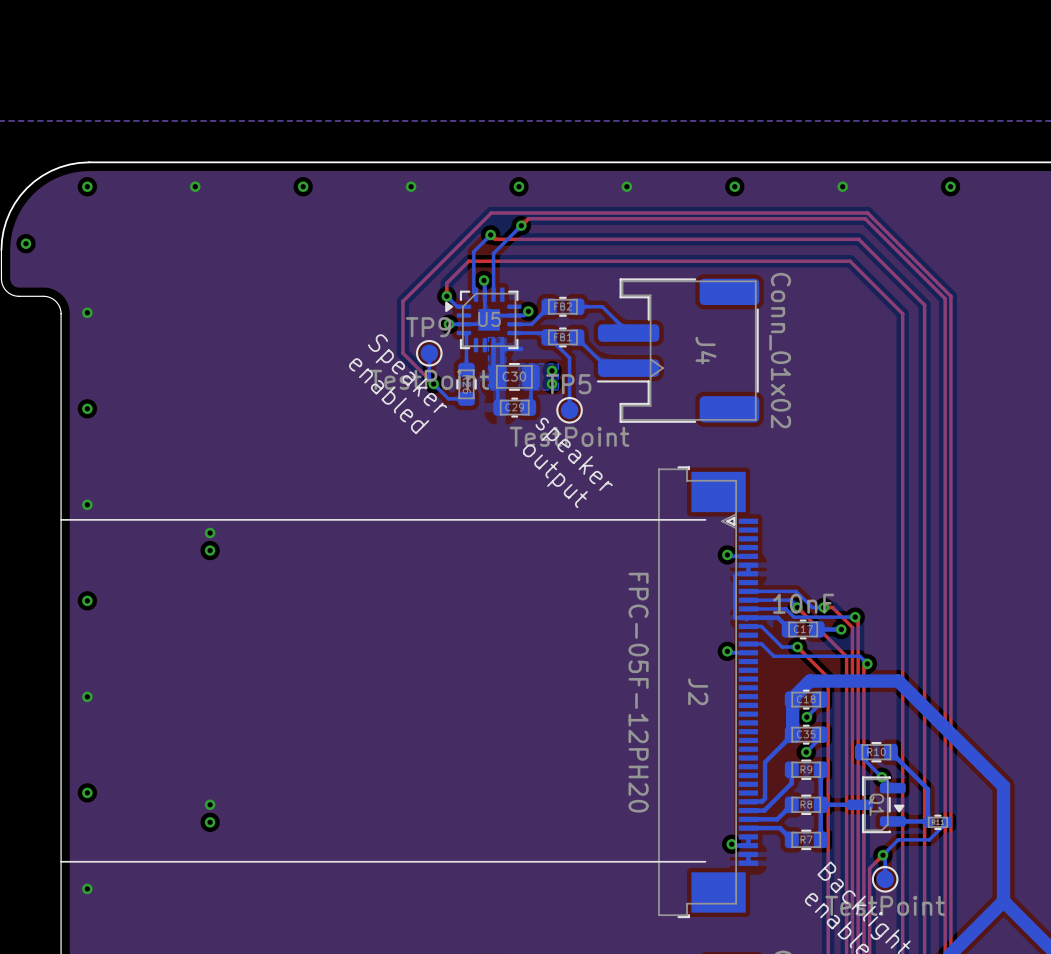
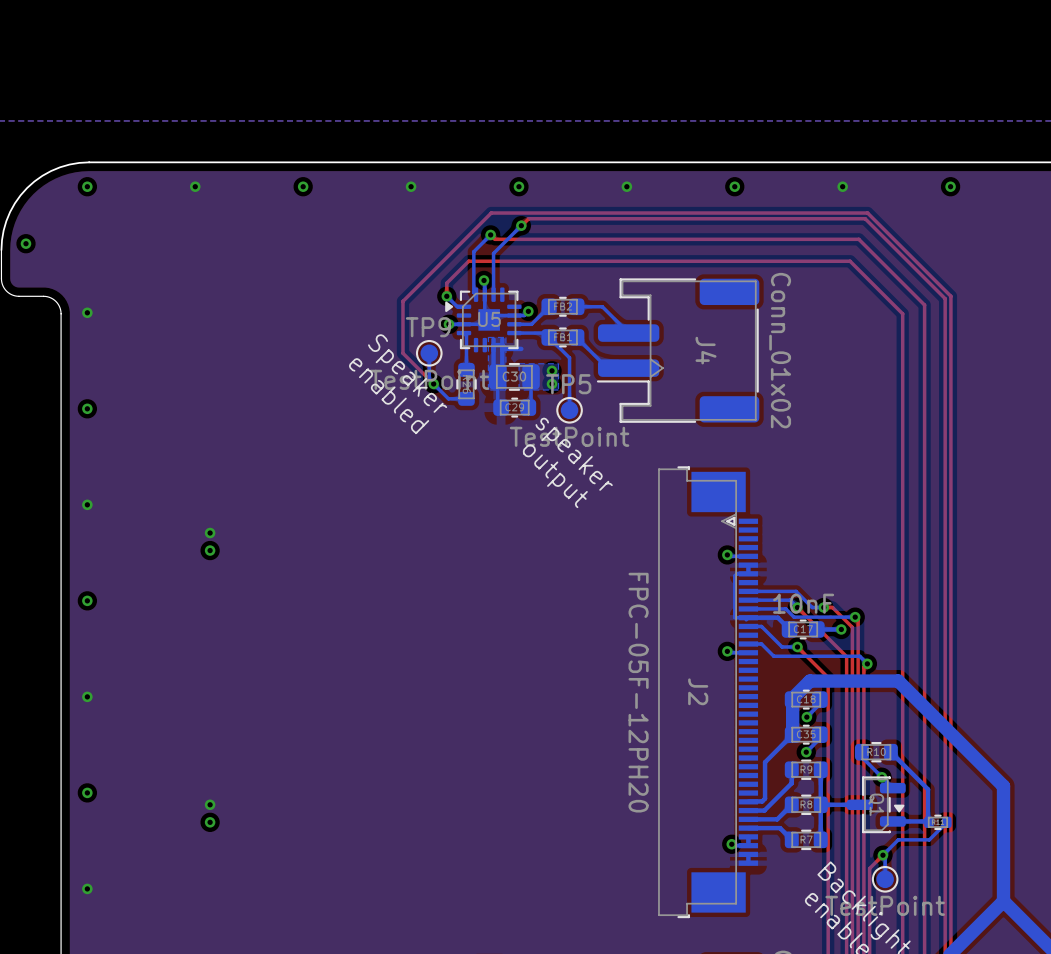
line: (705, 519) (61, 519) -> none
line: (705, 861) (61, 861) -> none

